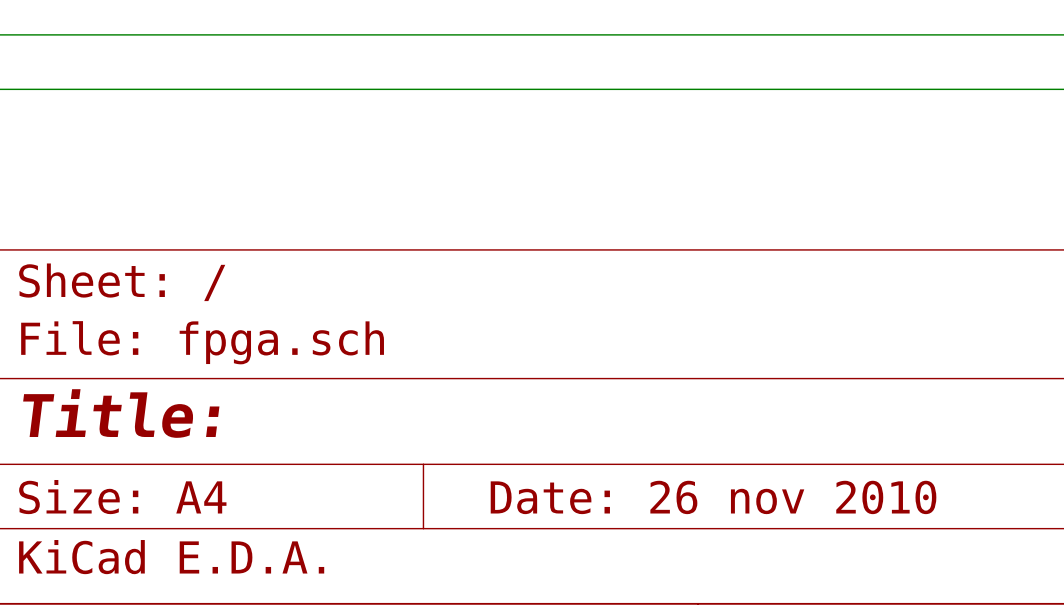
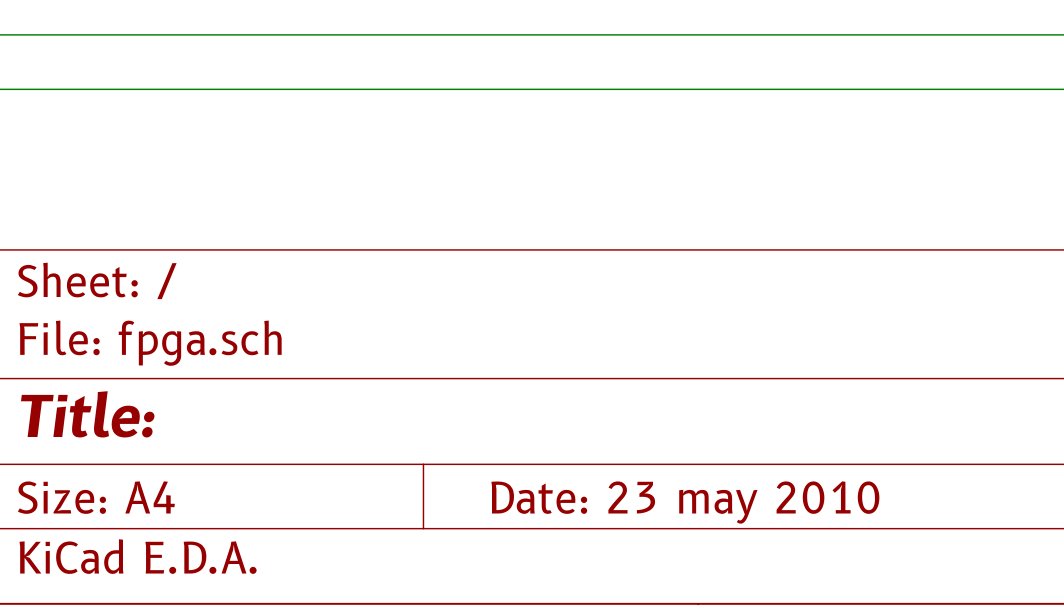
title block: Date: 26 nov 2010 (713, 497) -> Date: 23 may 2010 (685, 502)

